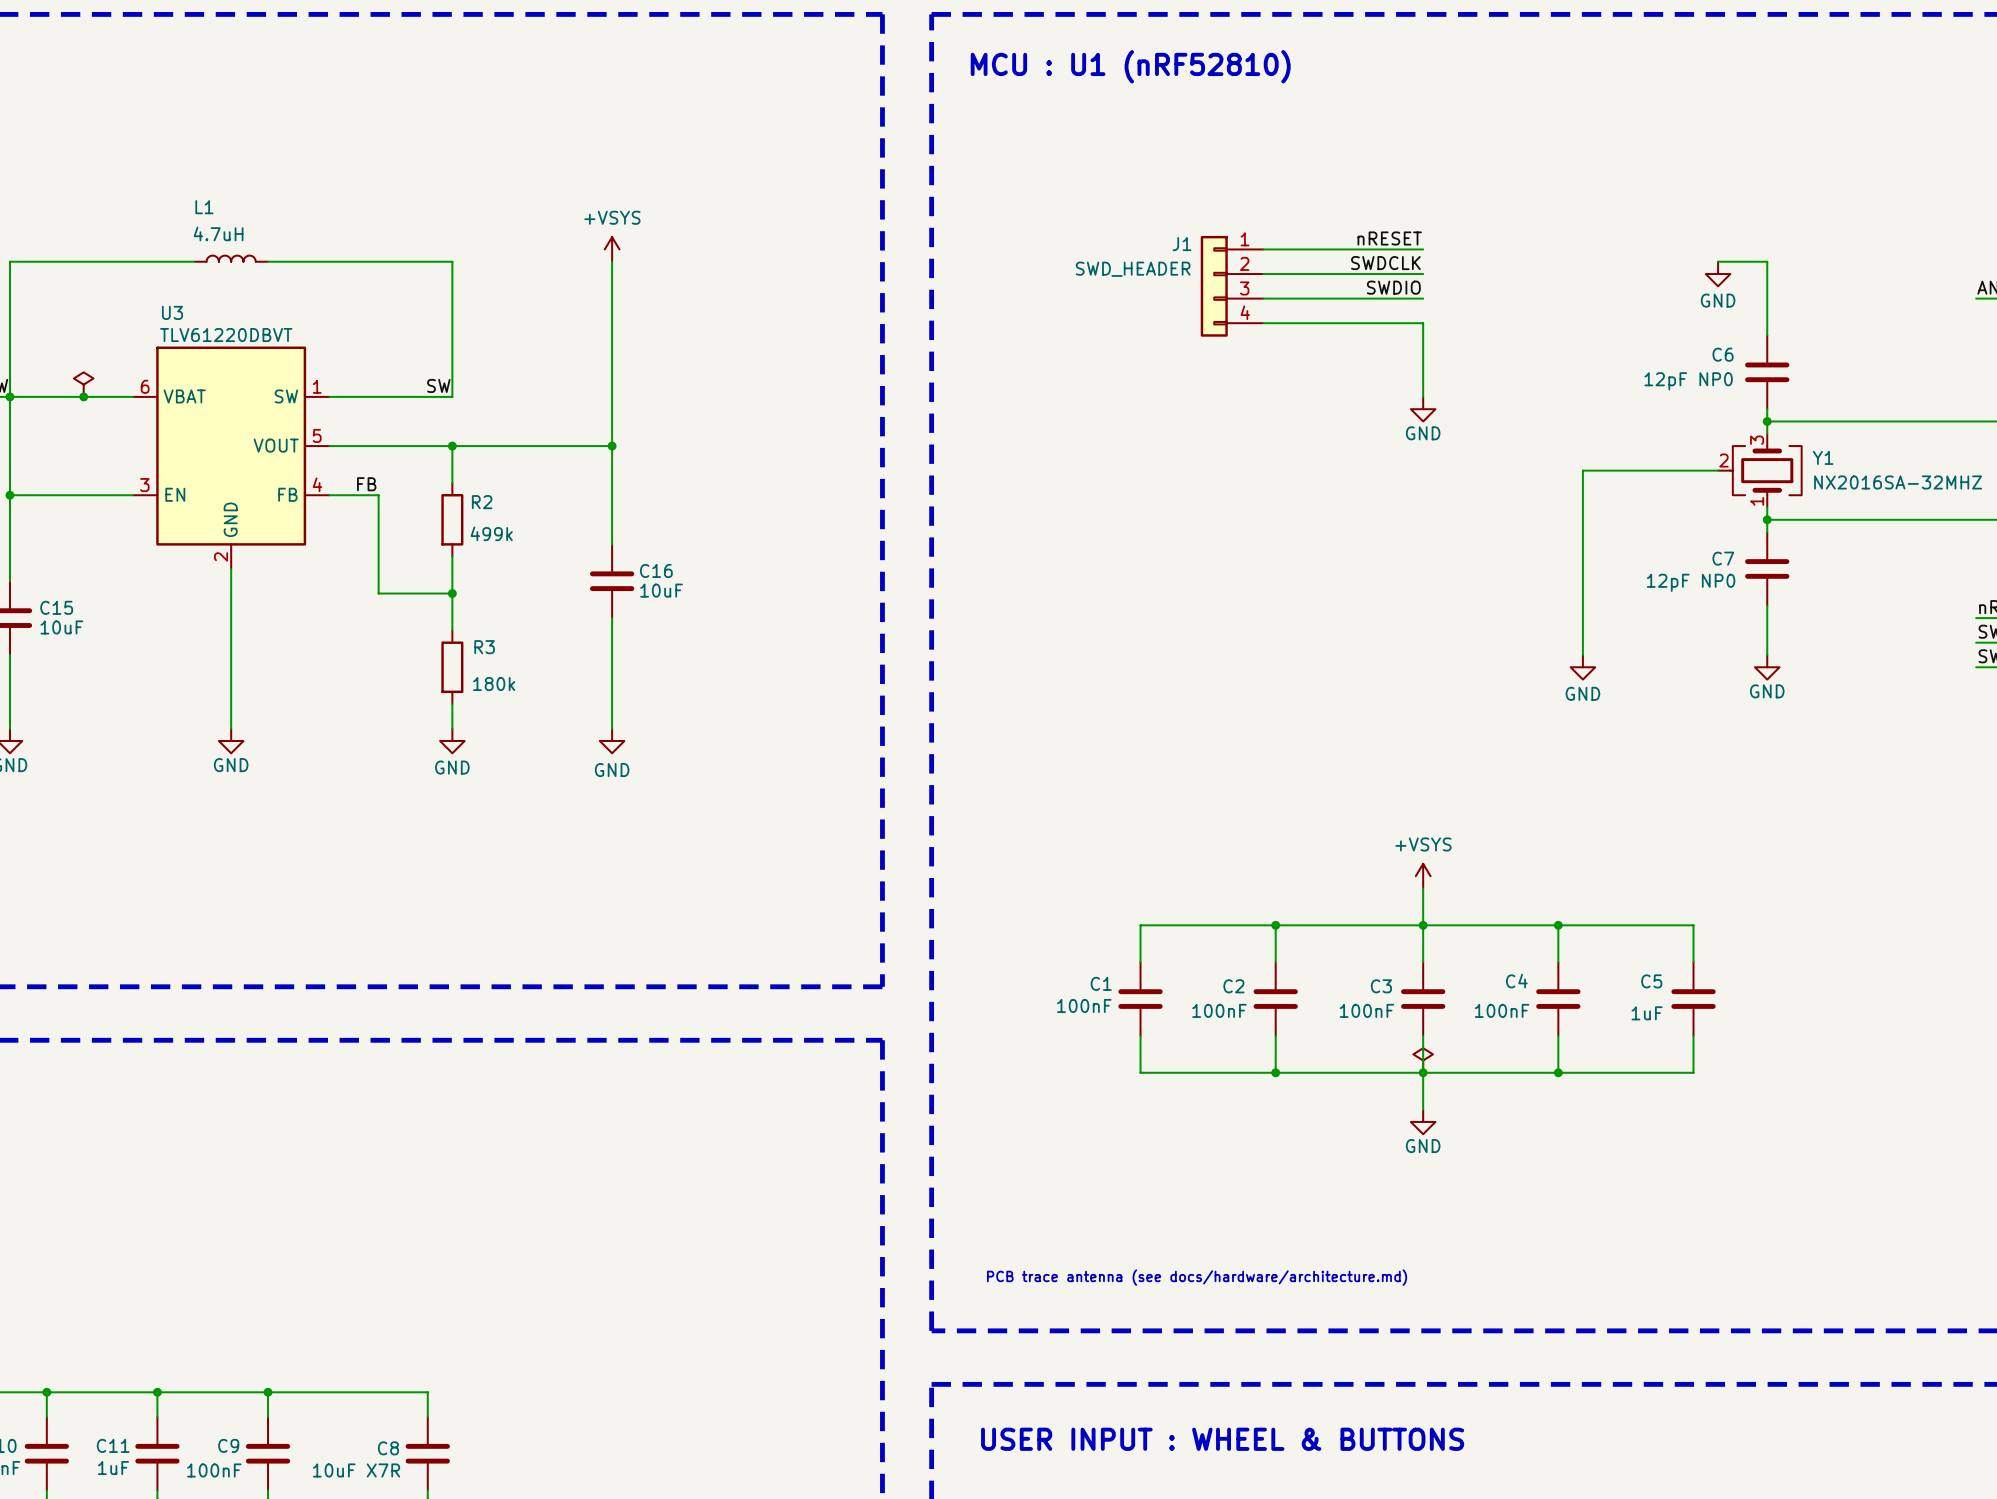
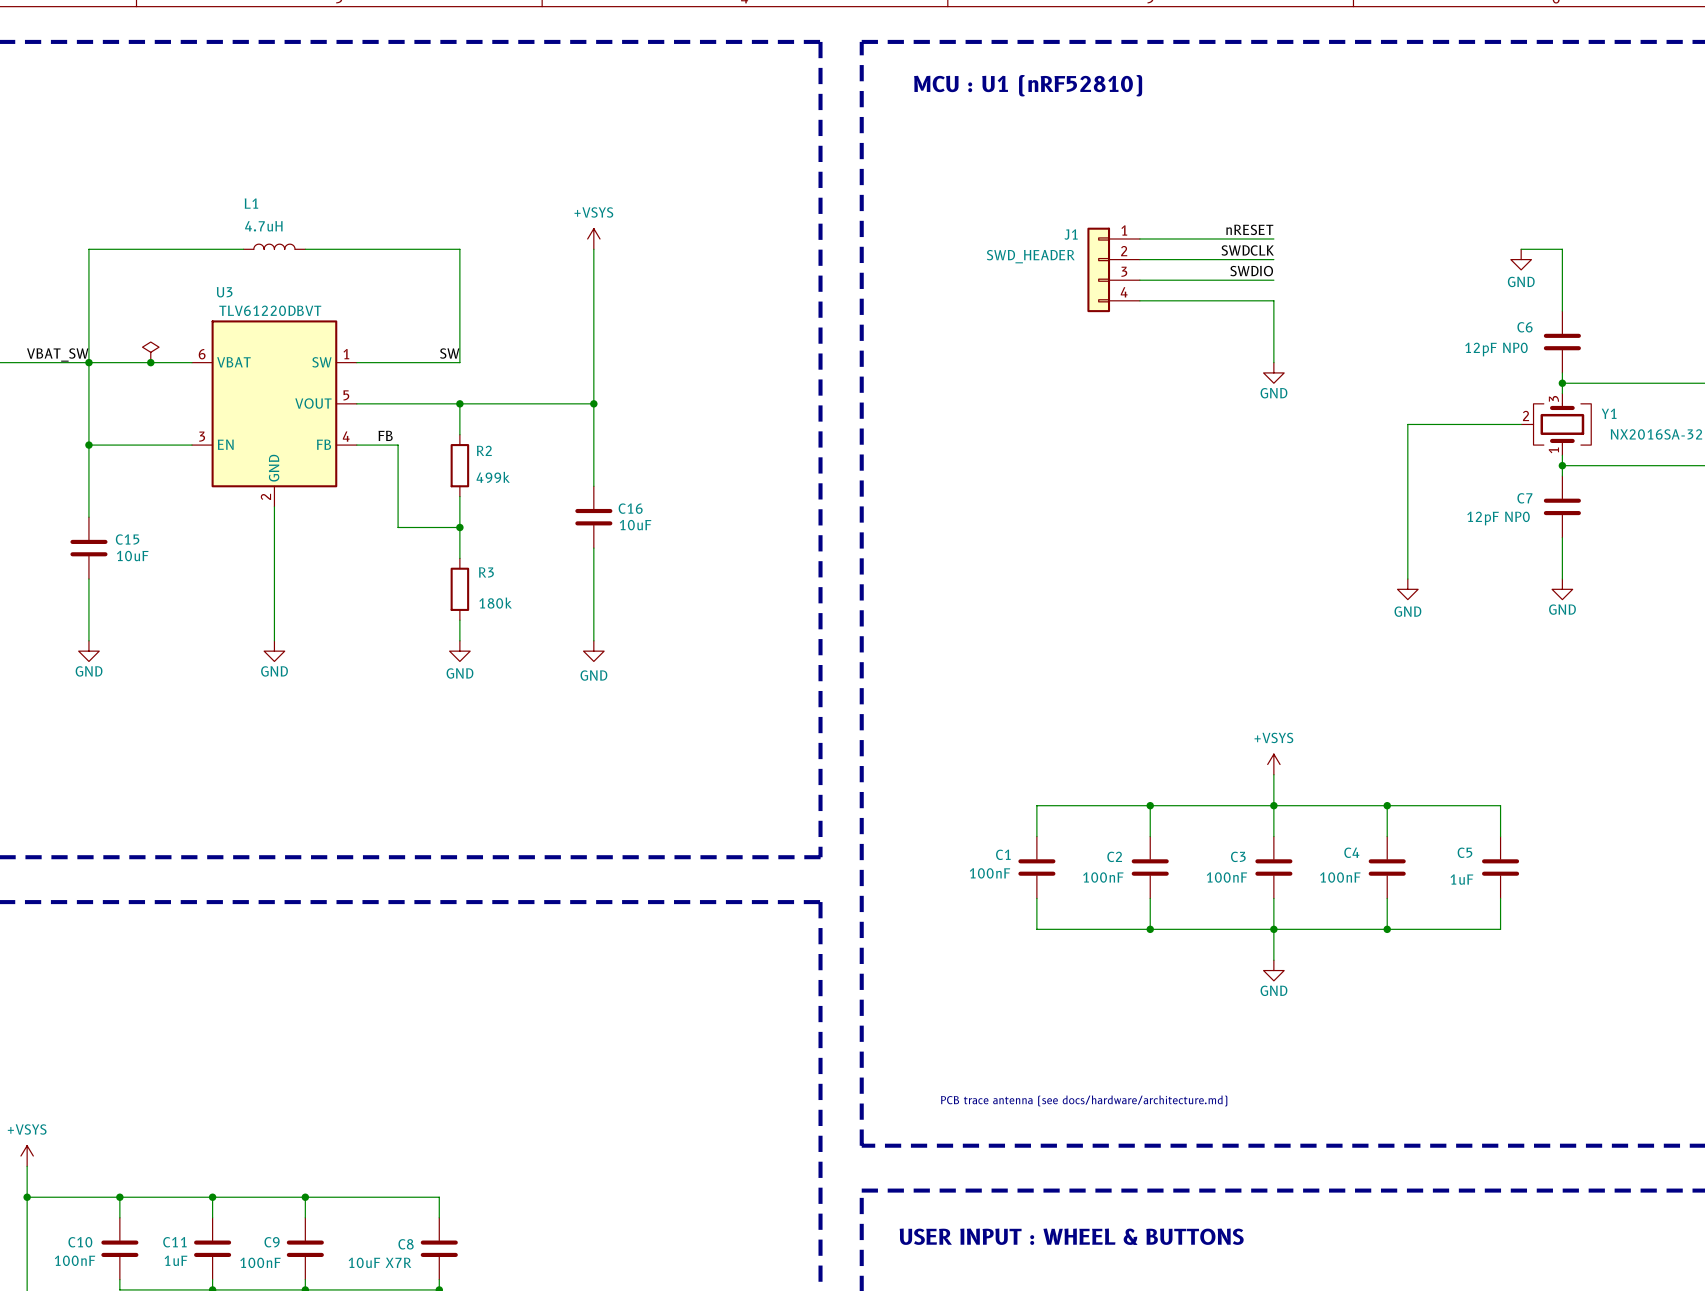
power symbol: (1423, 1060) -> none

